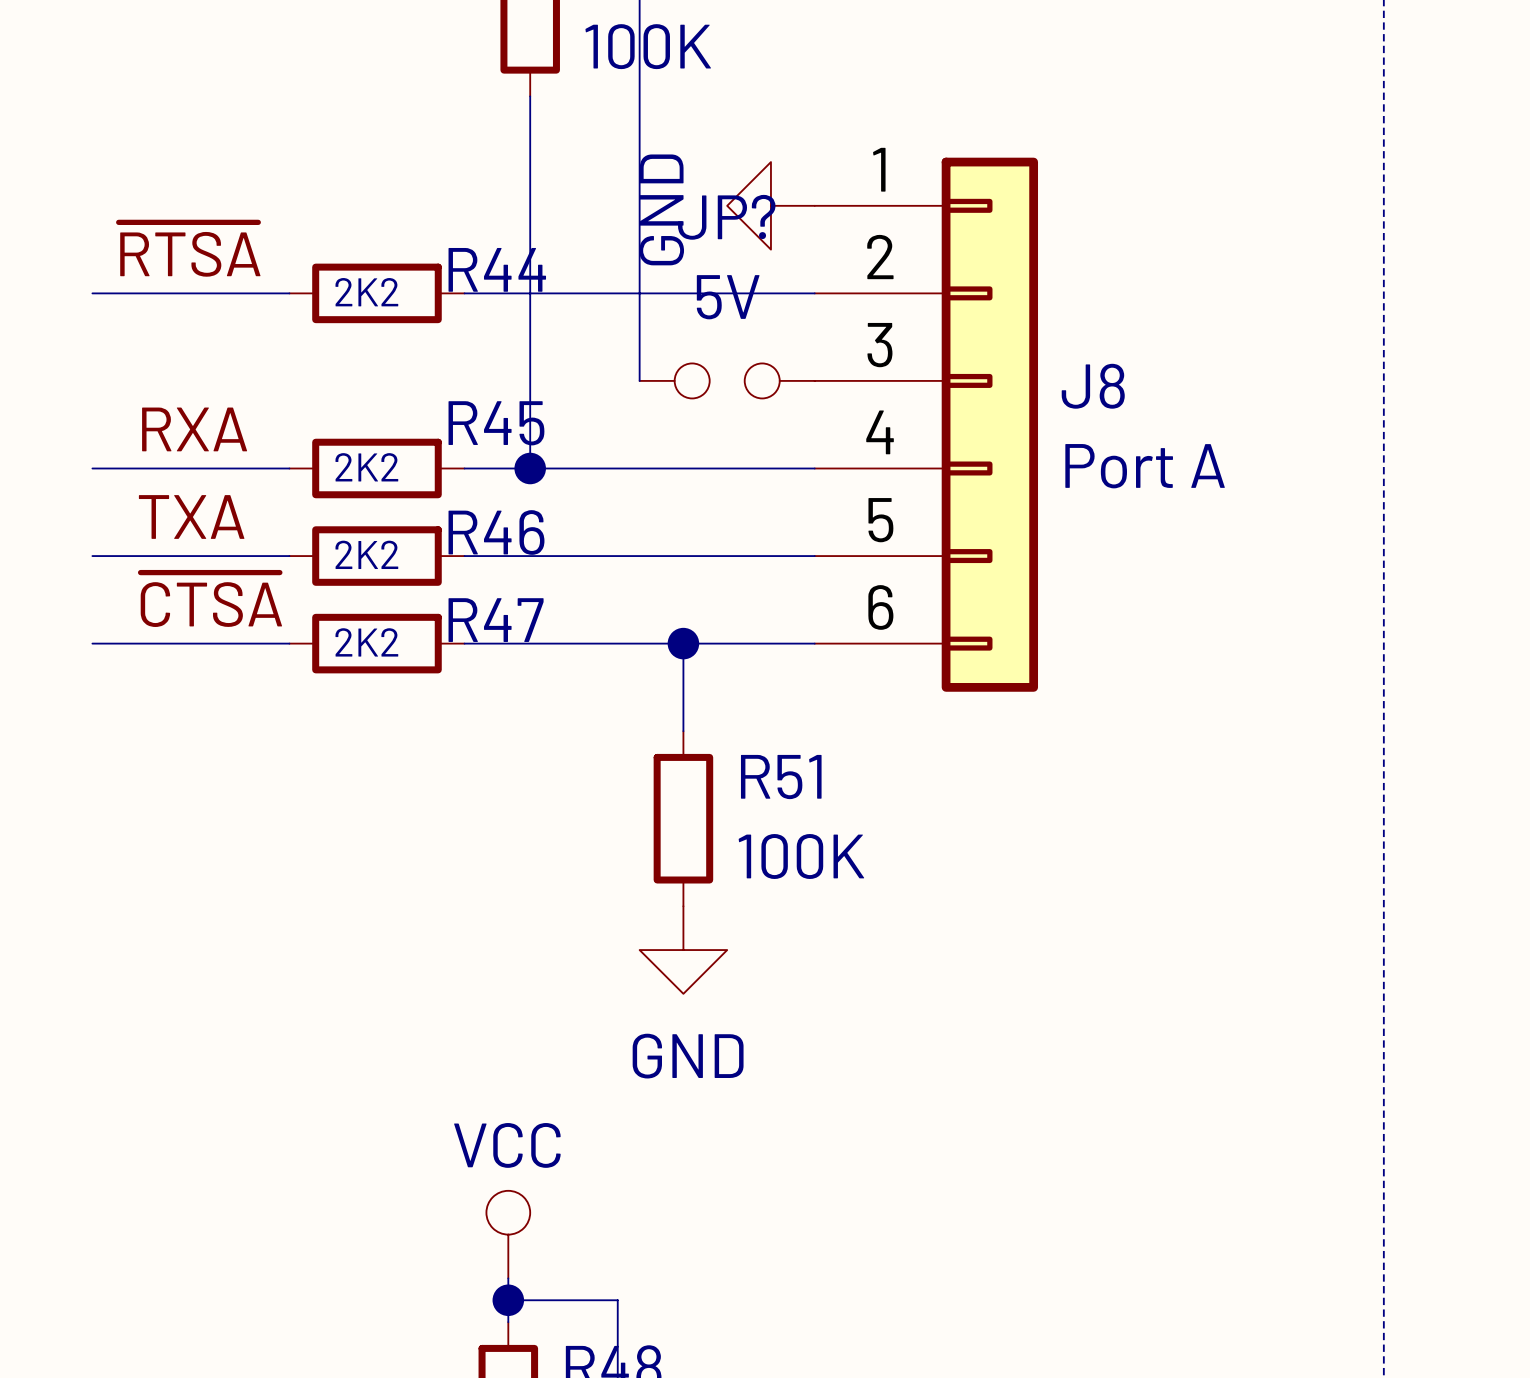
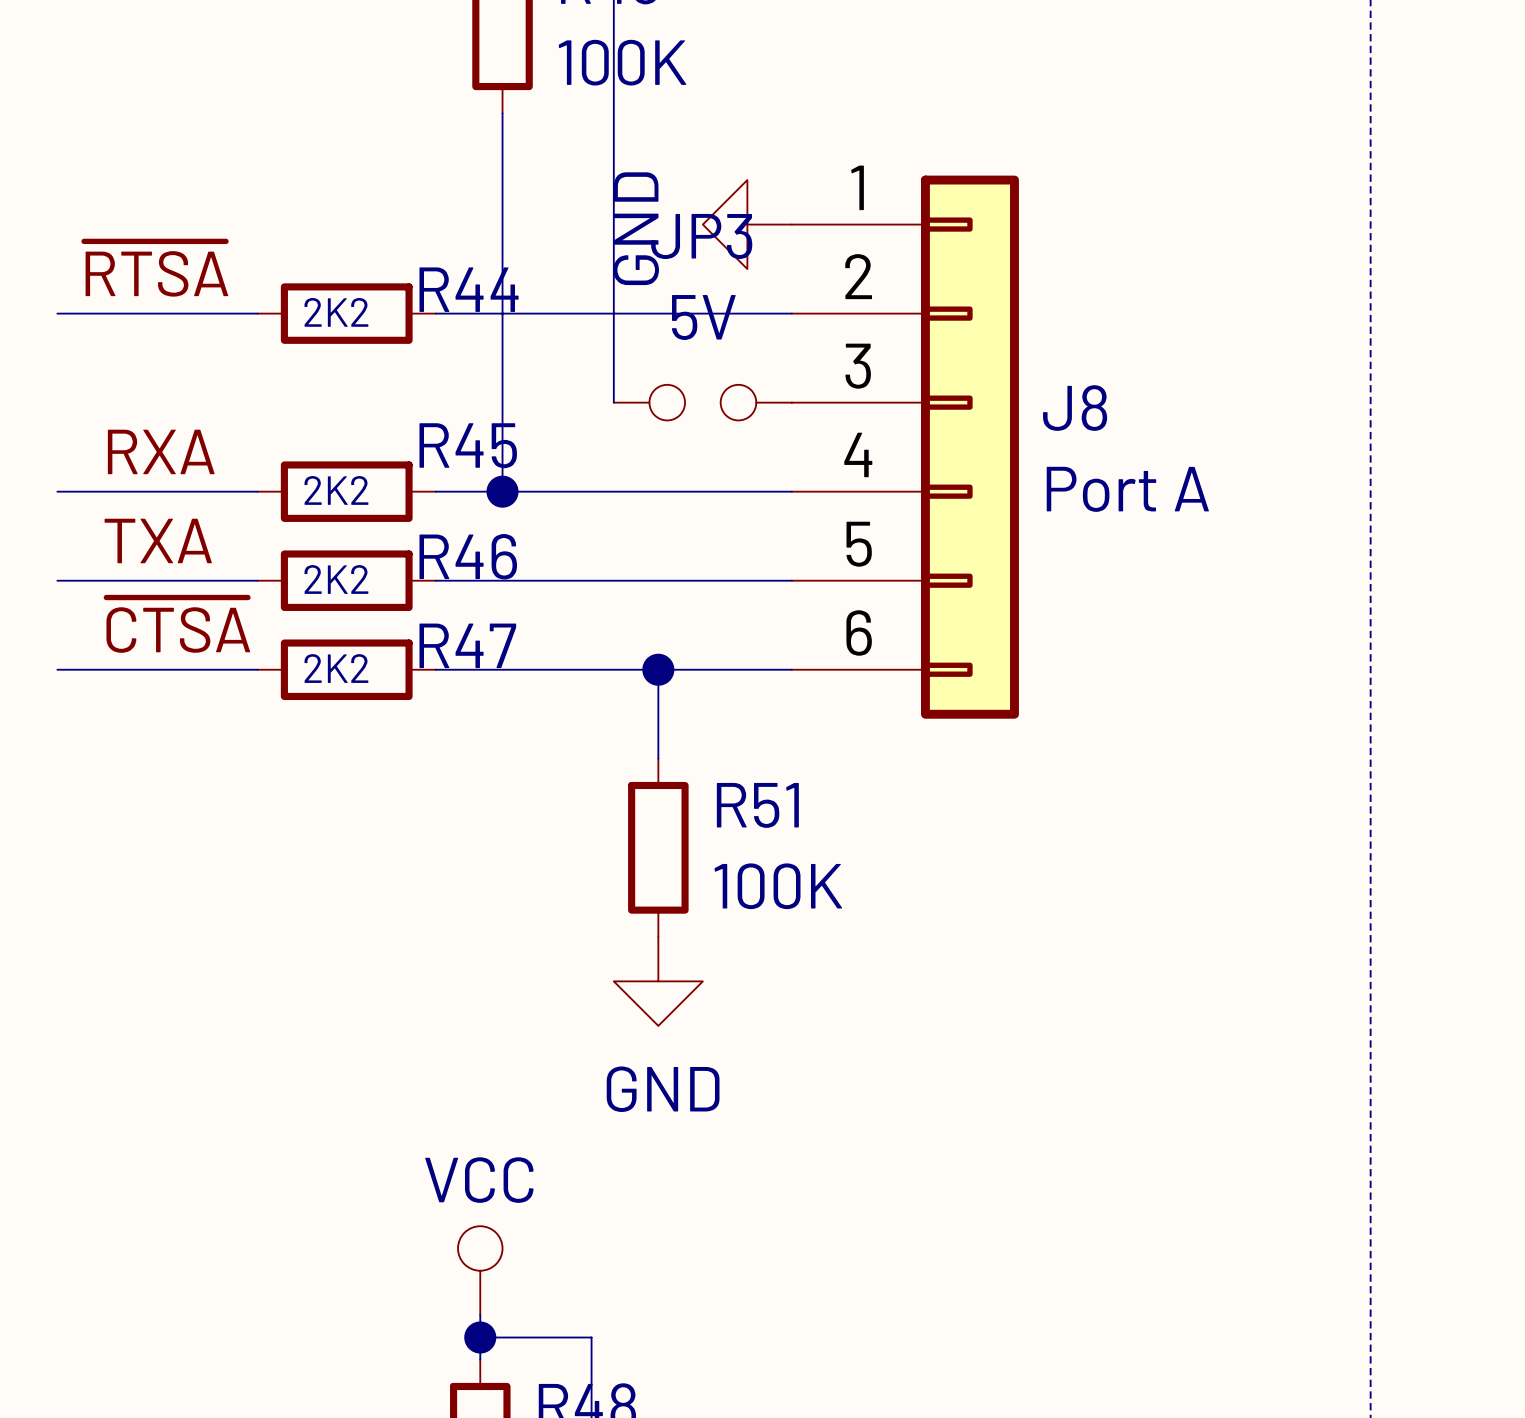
JP? name: JP? (726, 217) -> JP3 (701, 236)

